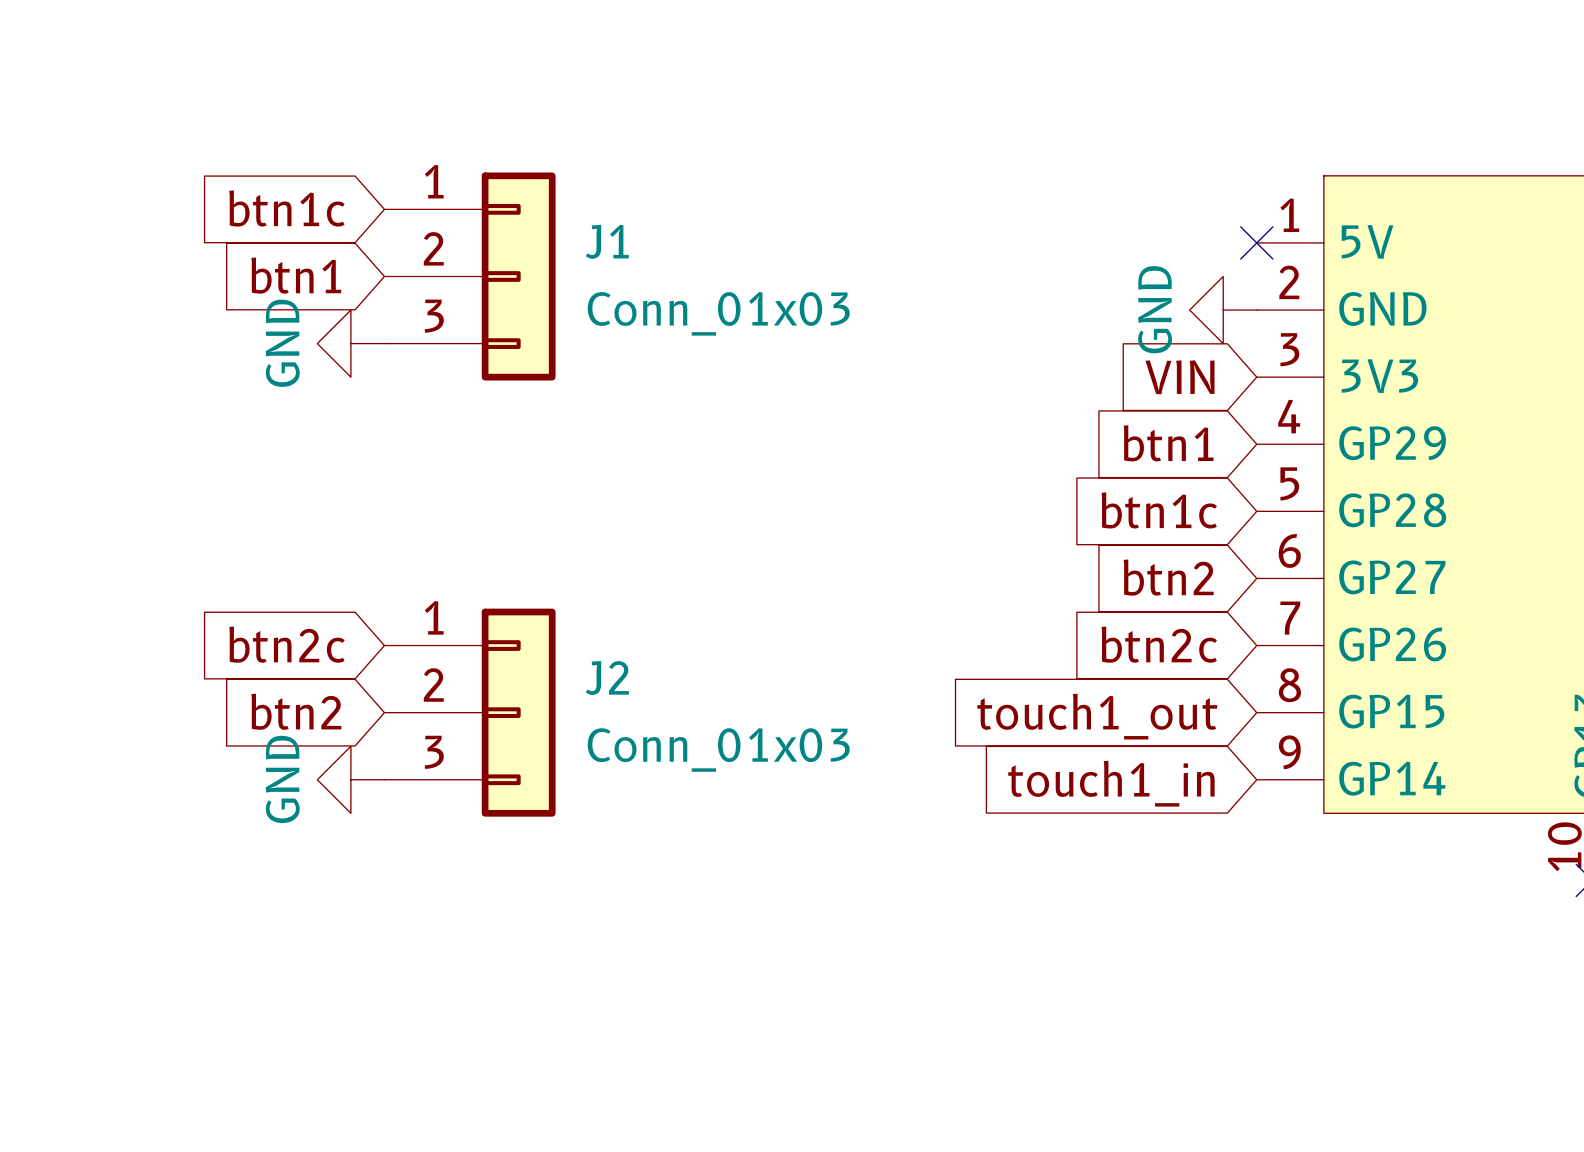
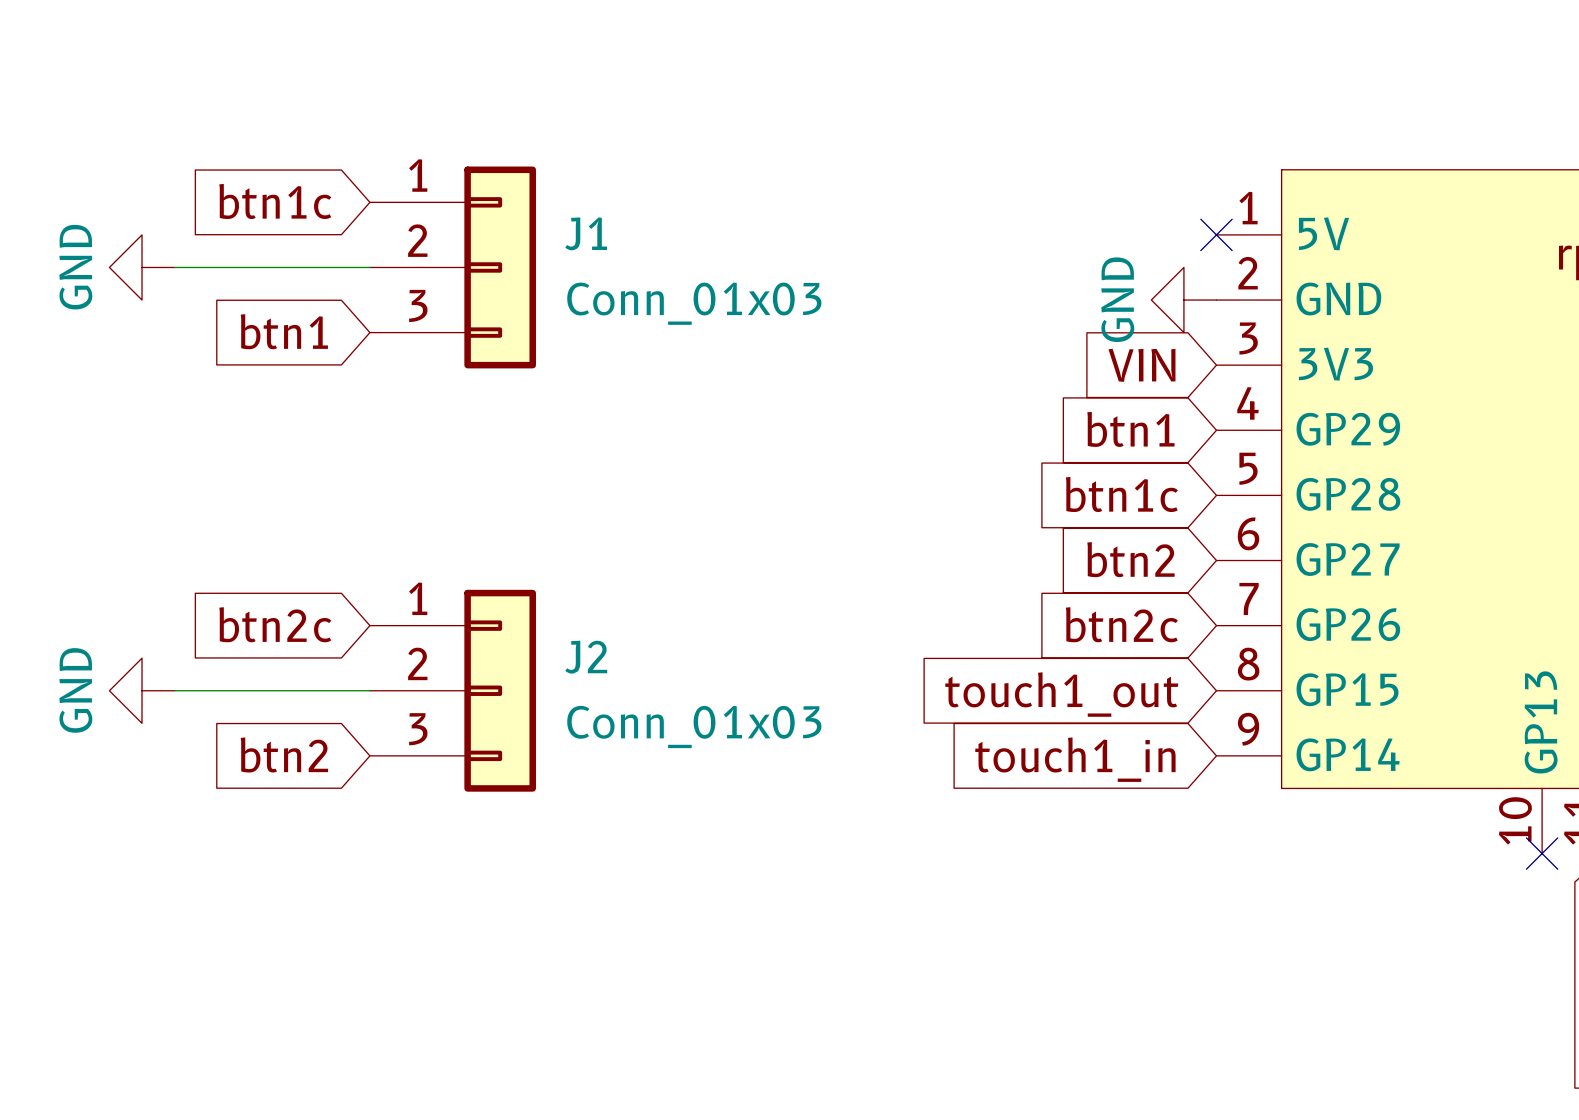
global label position: btn1 (296, 275) -> btn1 (284, 331)
power symbol: none -> GND (142, 267)
wire: none -> (174, 267) (369, 267)
power symbol: GND (350, 343) -> none
global label position: btn2 (296, 711) -> btn2 (284, 754)
power symbol: none -> GND (142, 690)
wire: none -> (174, 690) (369, 690)
power symbol: GND (350, 779) -> none

